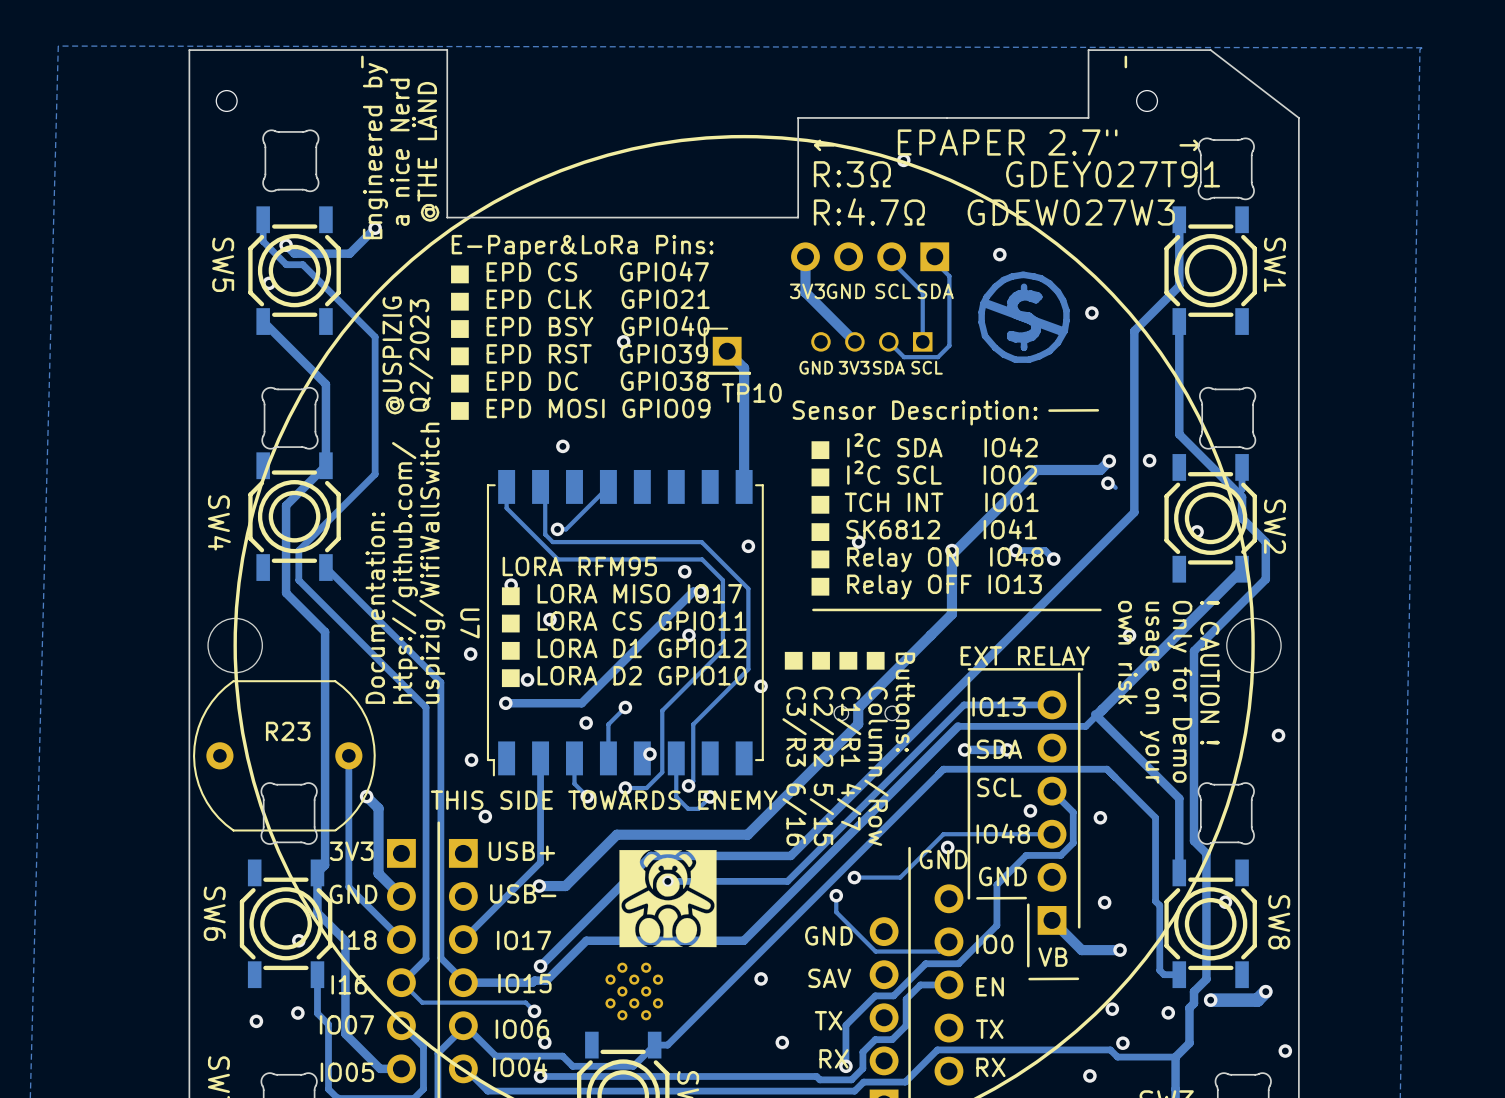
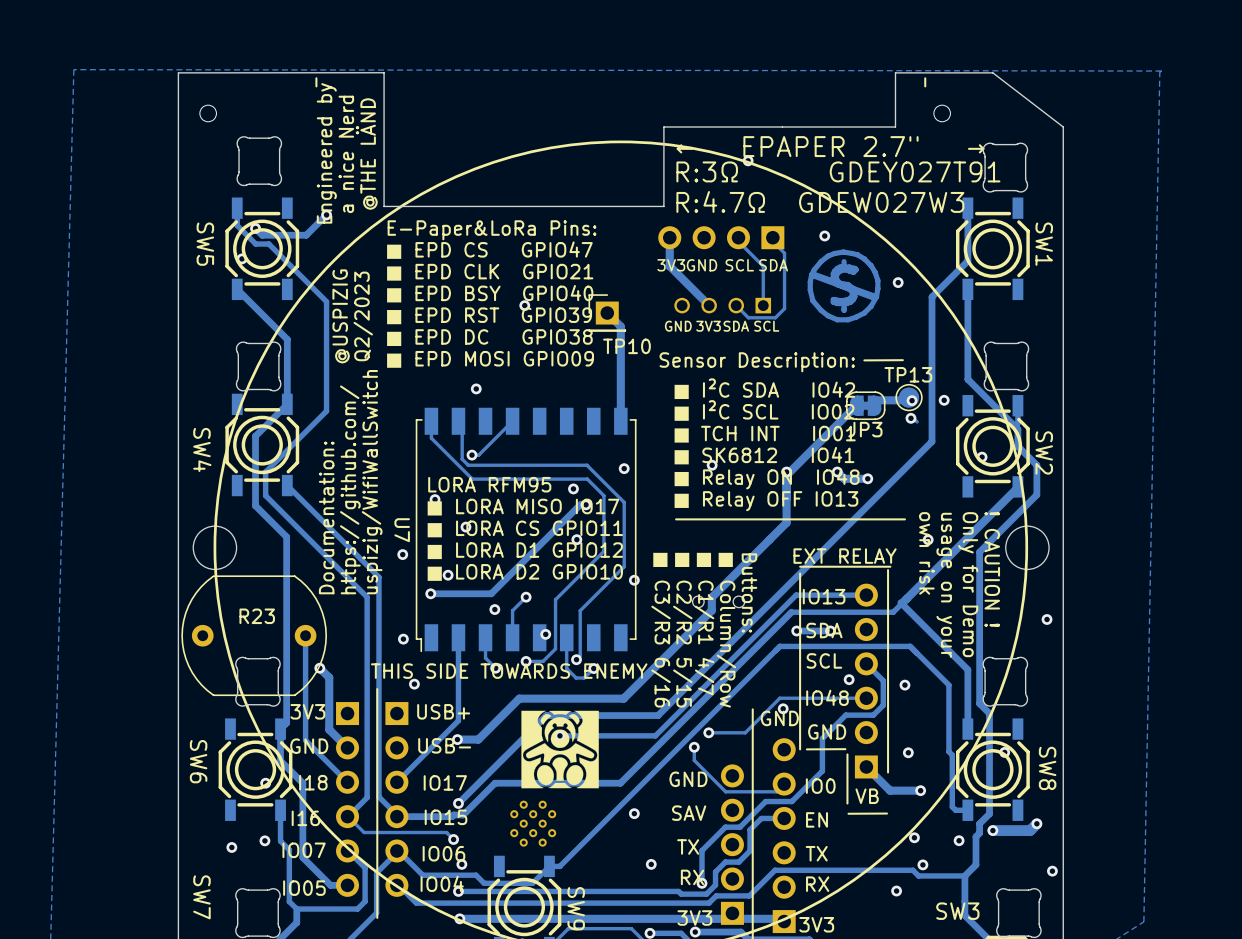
TP13: none -> (909, 397)
track: none -> (900, 400) (874, 400)
track: (1109, 461) (1100, 469) (1036, 469) -> none
JP3: none -> (865, 405)
track: none -> (837, 472) (844, 478) (867, 478)
track: (1018, 550) (1045, 550) (1052, 557) -> none

